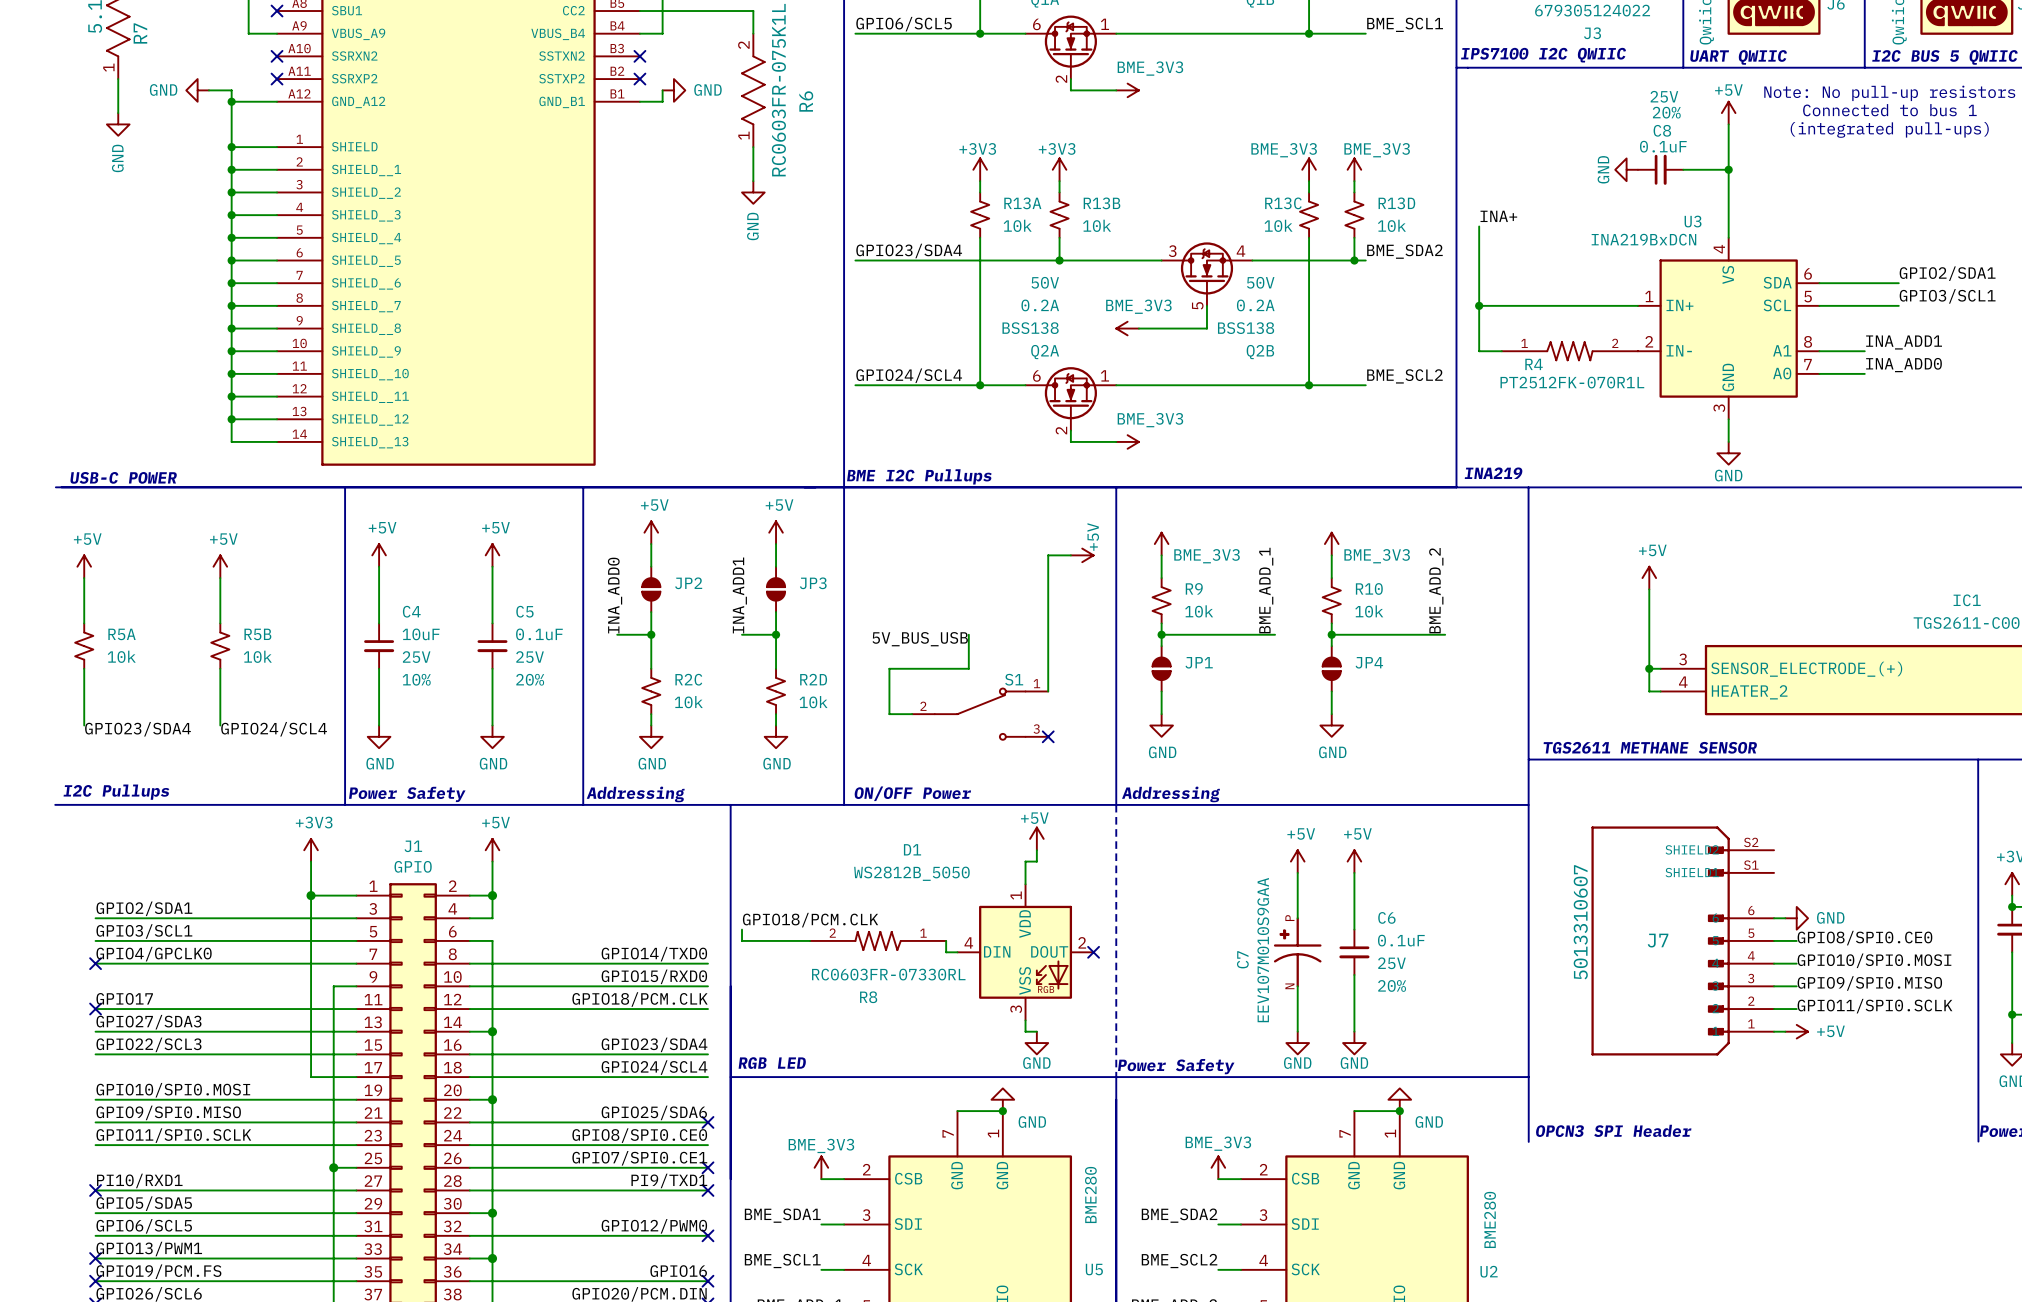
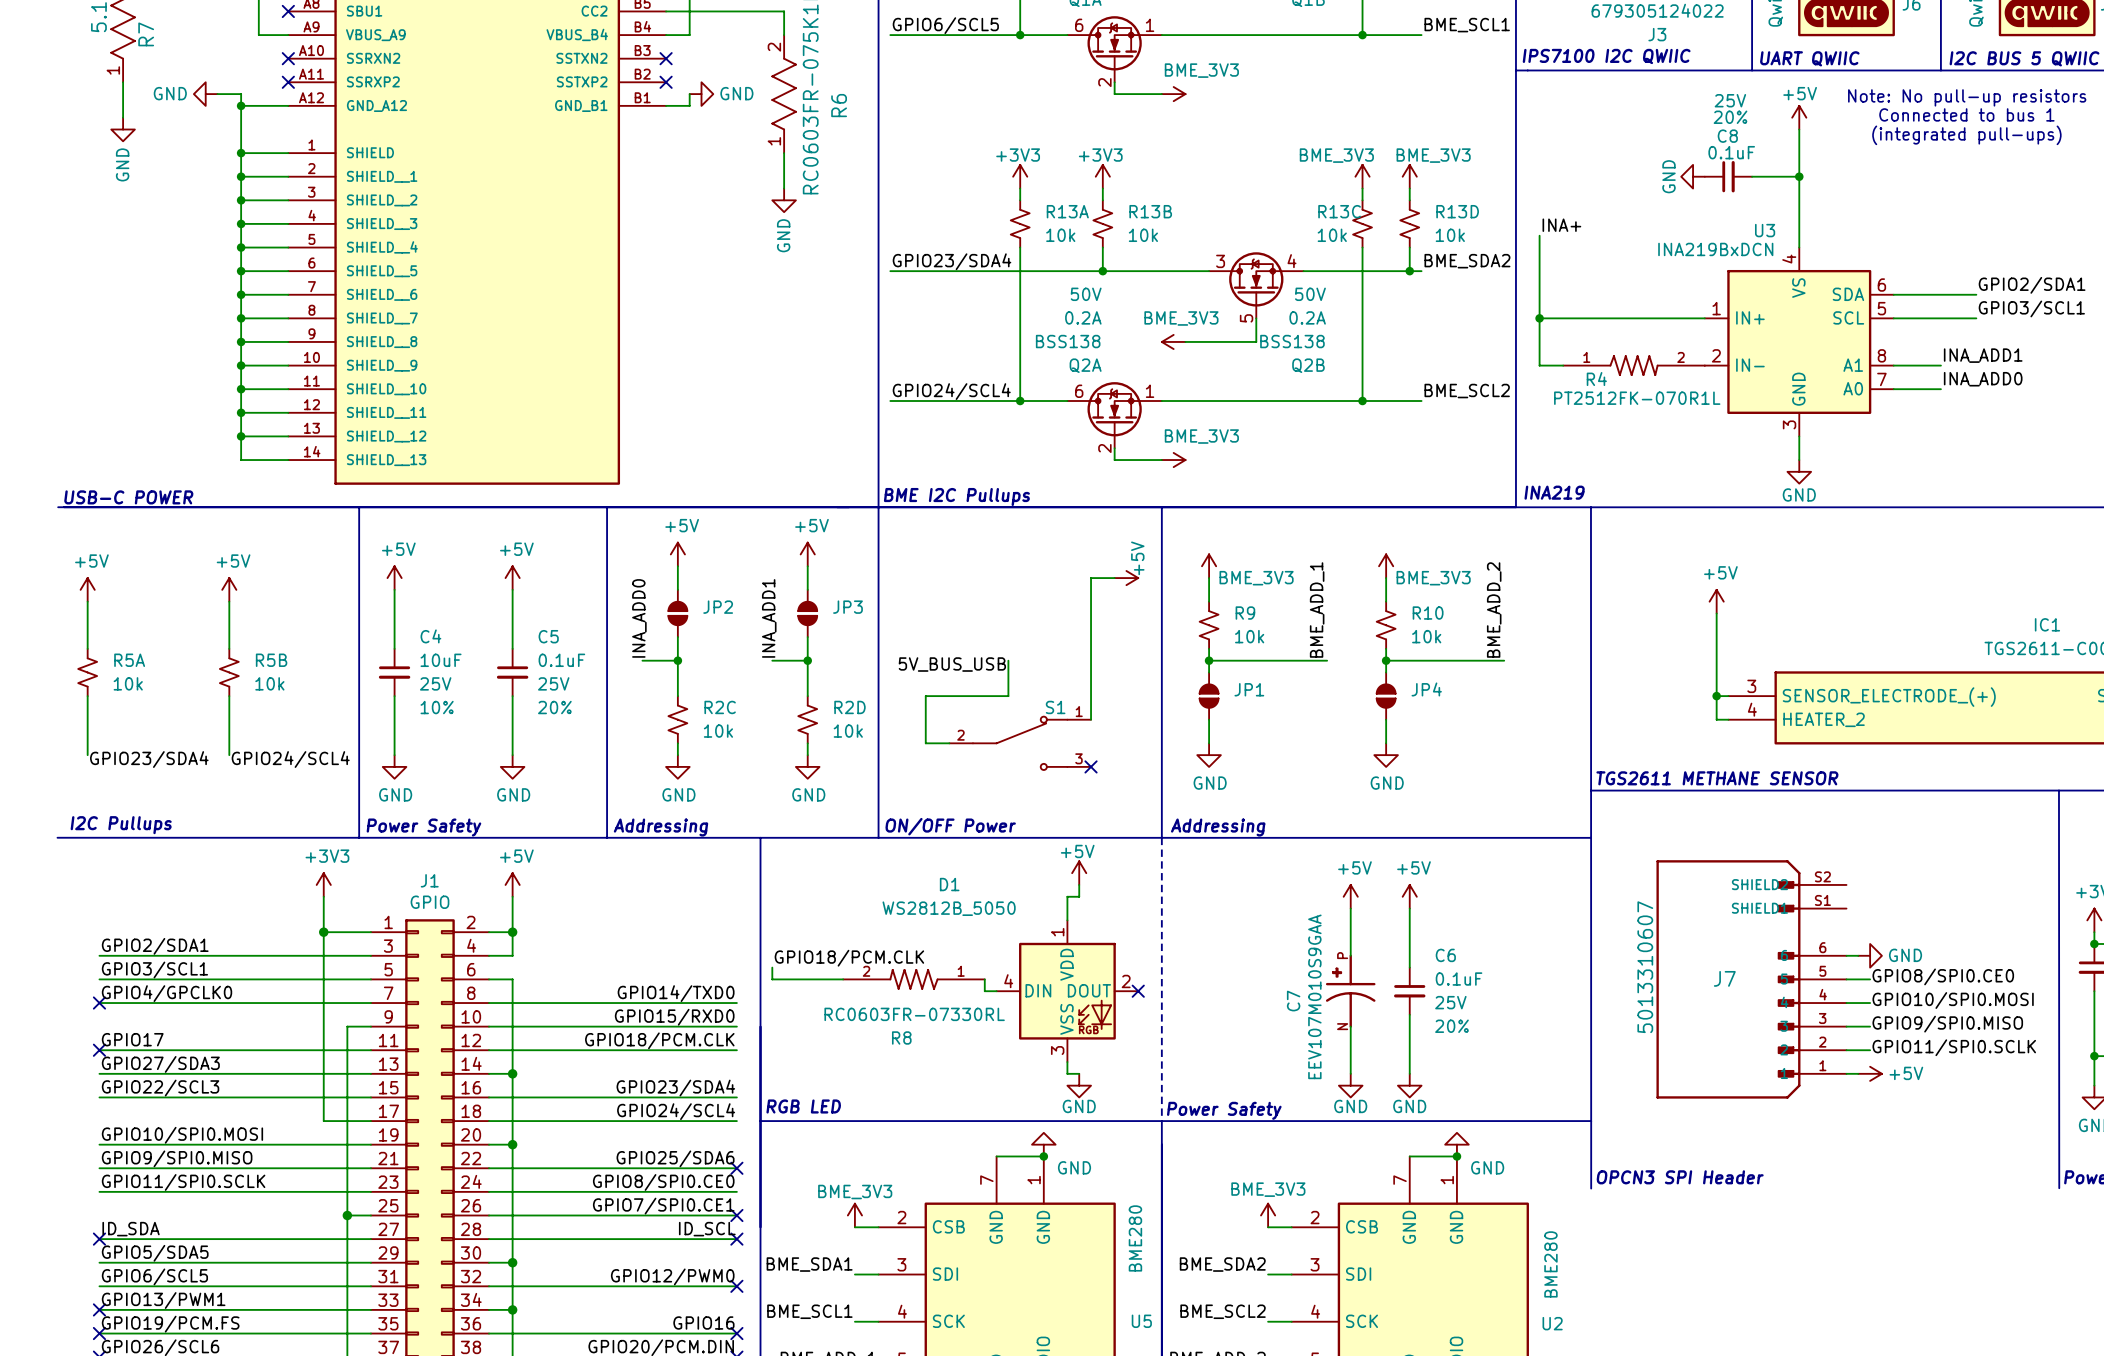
label: PI10/RXD1 (139, 1180) -> ID_SDA (131, 1229)
label: PI9/TXD1 (669, 1180) -> ID_SCL (707, 1229)

